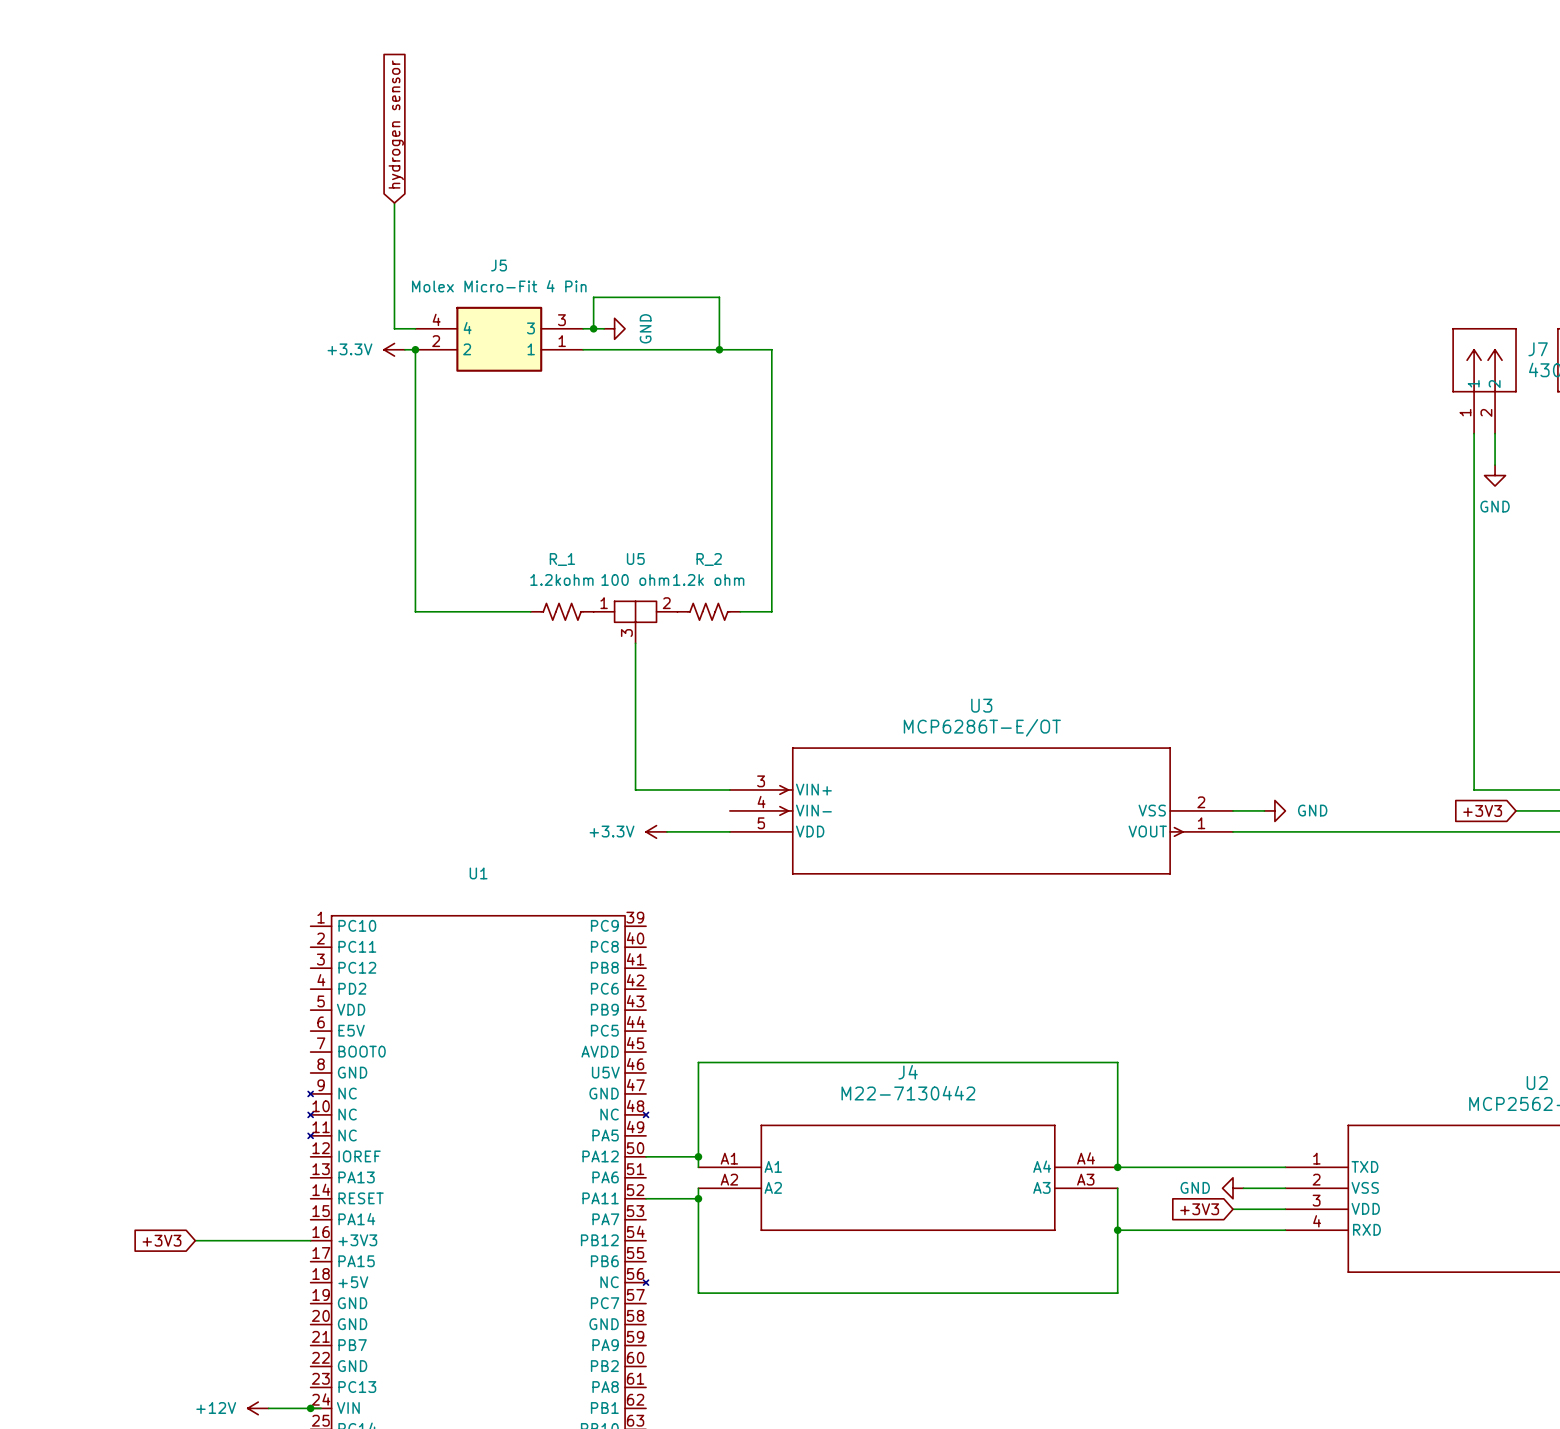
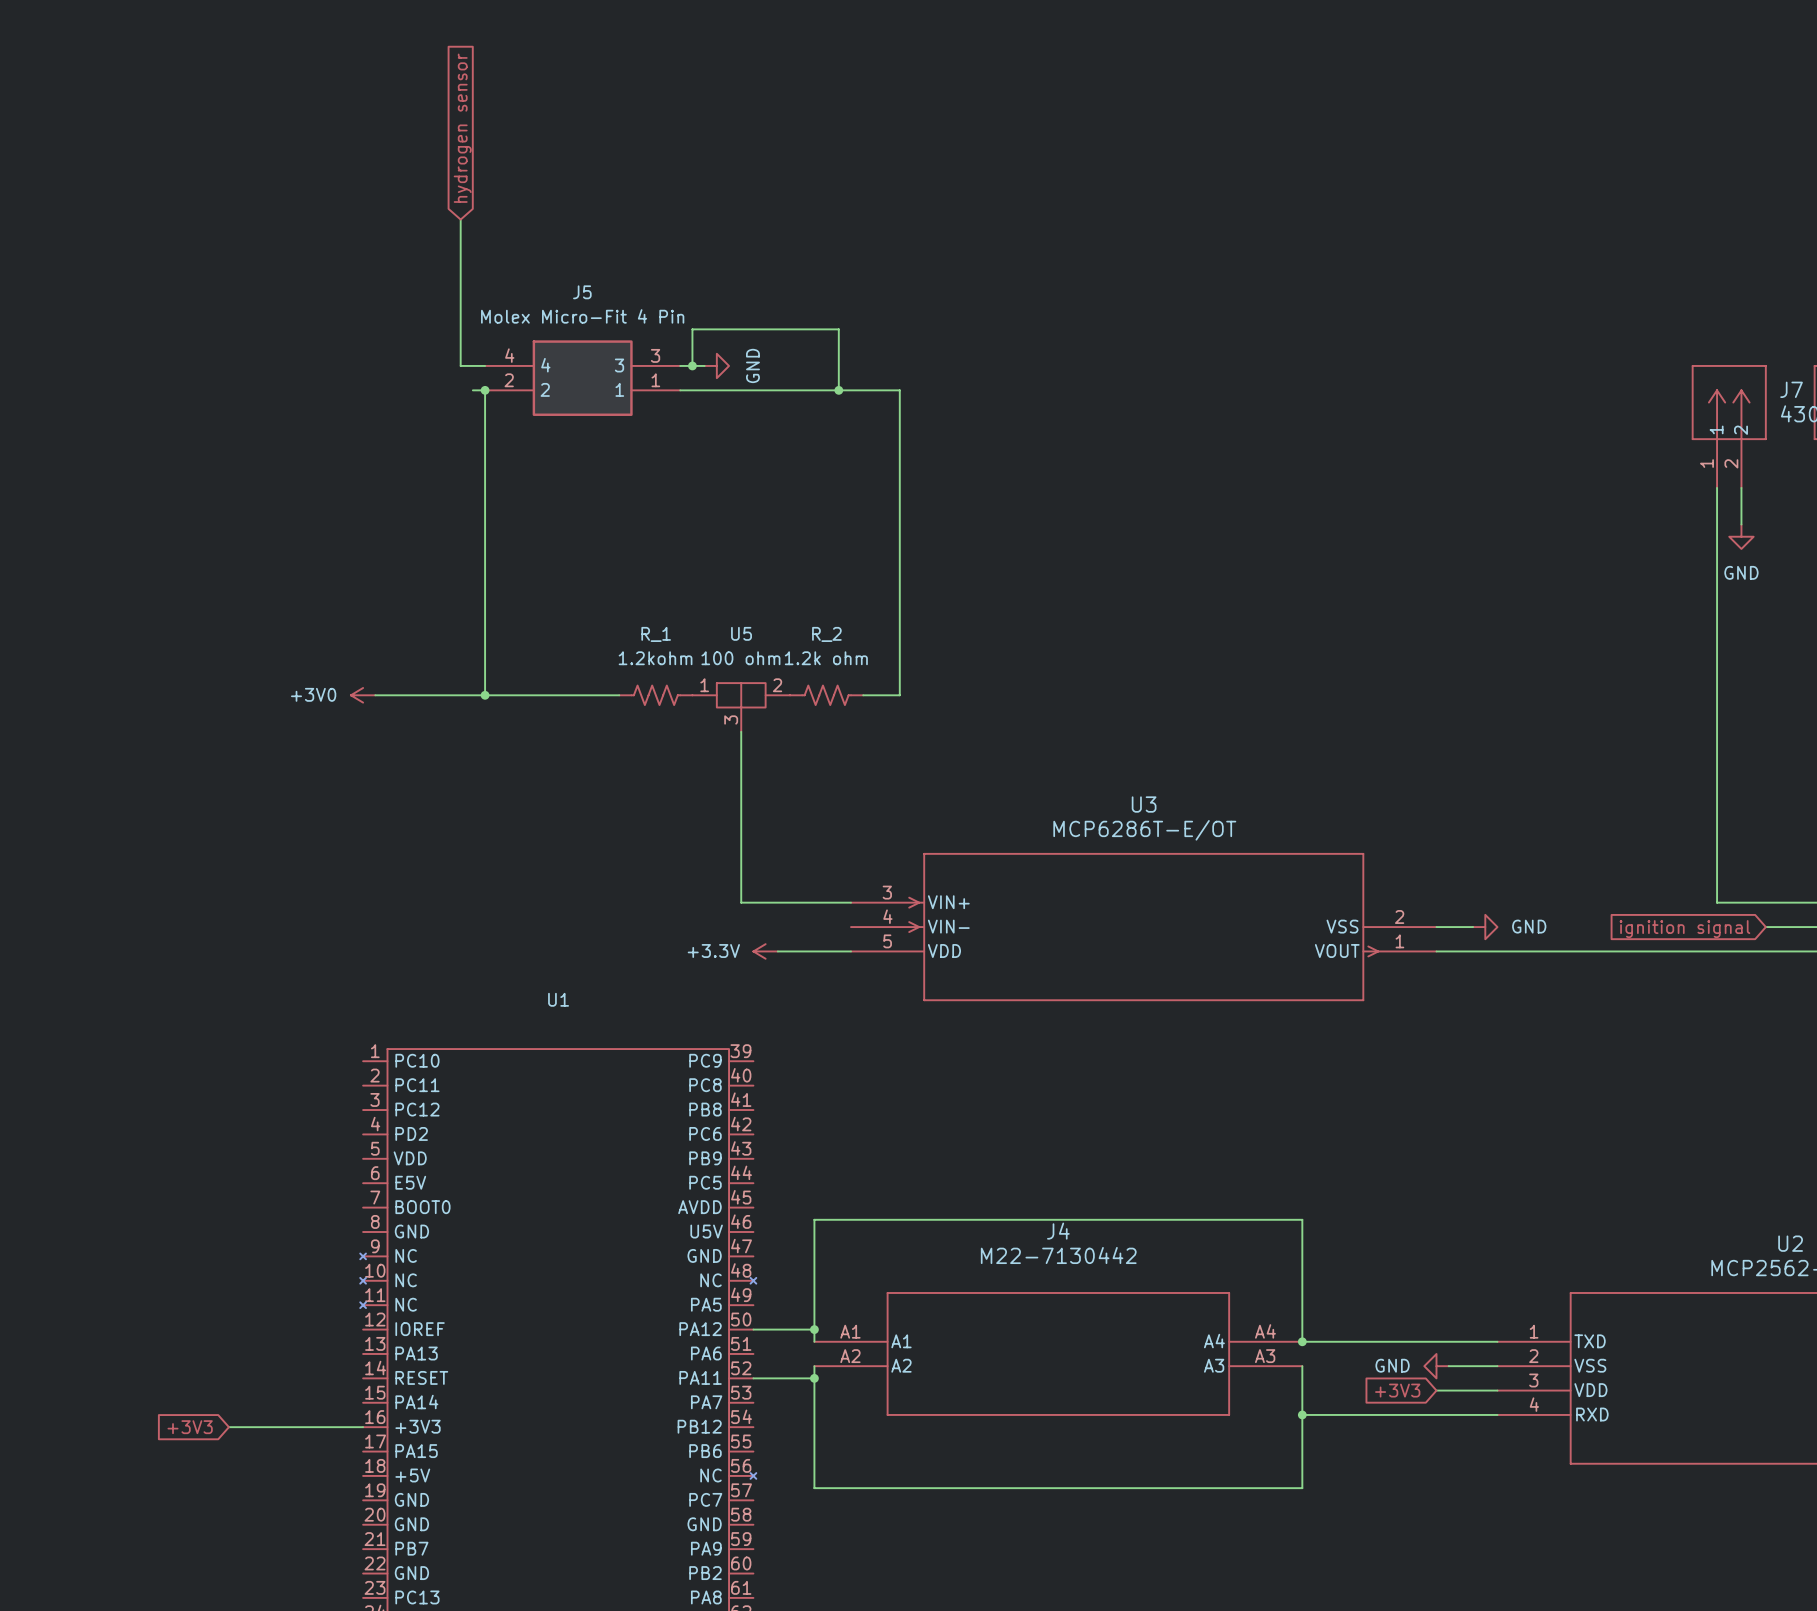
power symbol: +3.3V (394, 349) -> none
power symbol: none -> +3V0 (363, 695)
wire: none -> (375, 695) (485, 695)
junction: none -> (485, 695)
global label: +3V3 (1482, 810) -> ignition signal (1684, 929)

